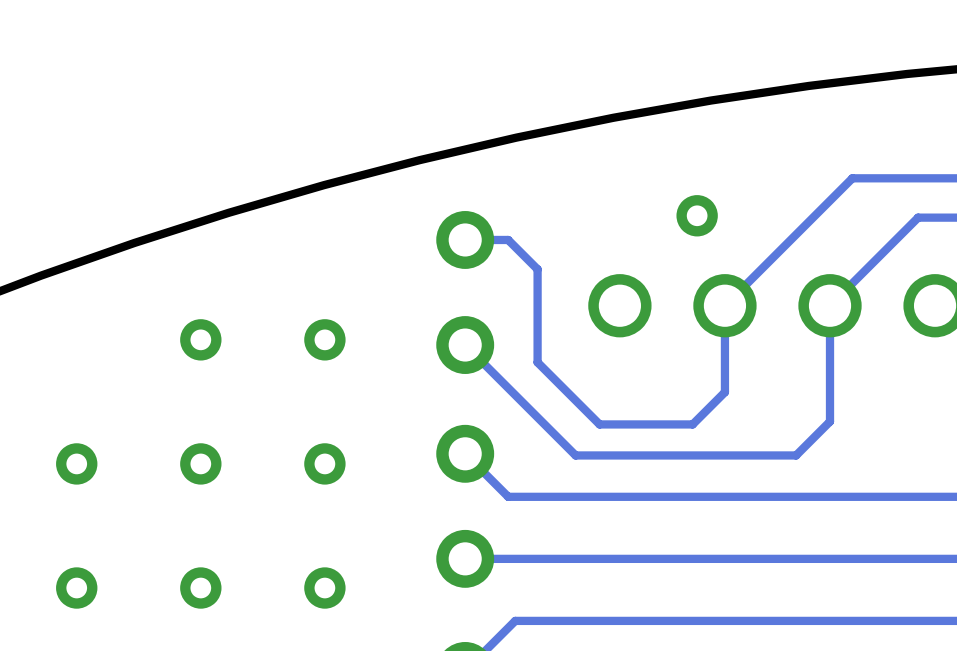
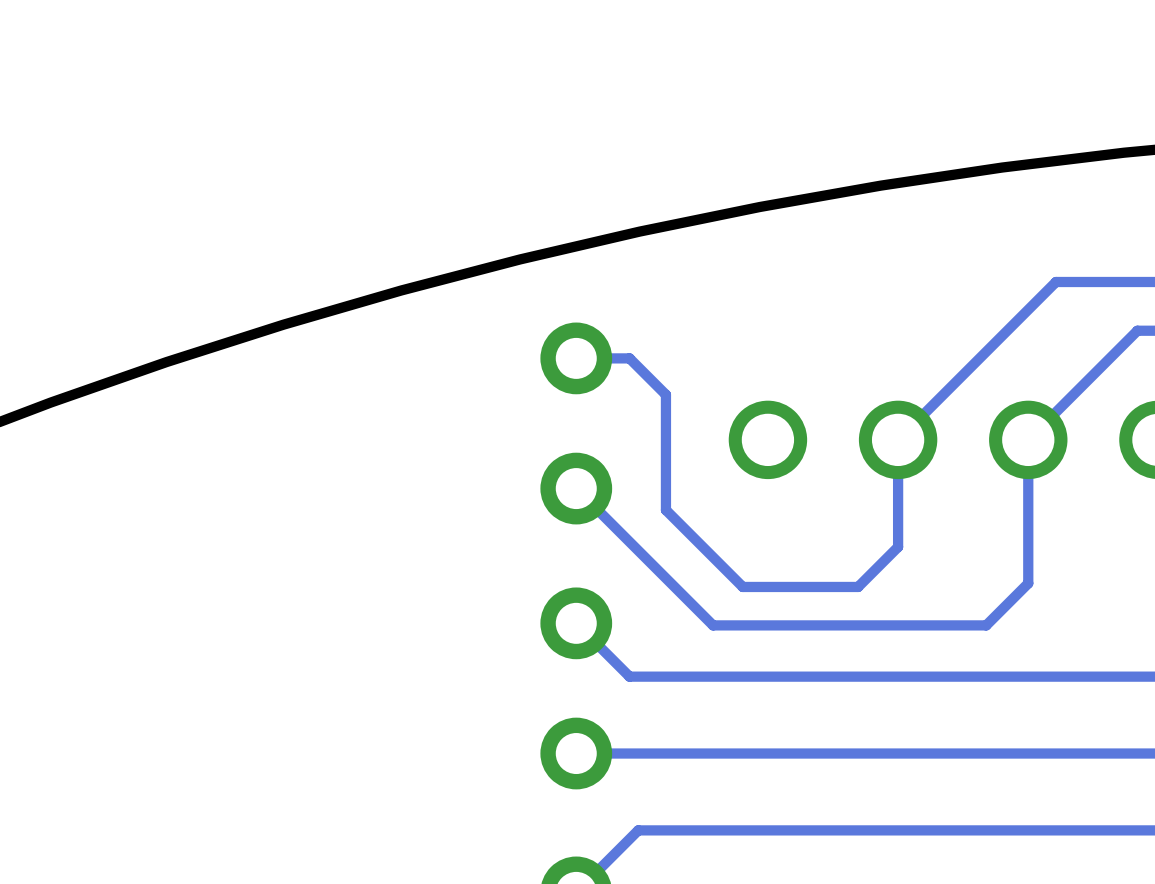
via: (697, 215) -> none
via: (200, 339) -> none
via: (324, 339) -> none
via: (76, 463) -> none
via: (200, 463) -> none
via: (324, 463) -> none
via: (76, 588) -> none
via: (200, 588) -> none
via: (324, 588) -> none

